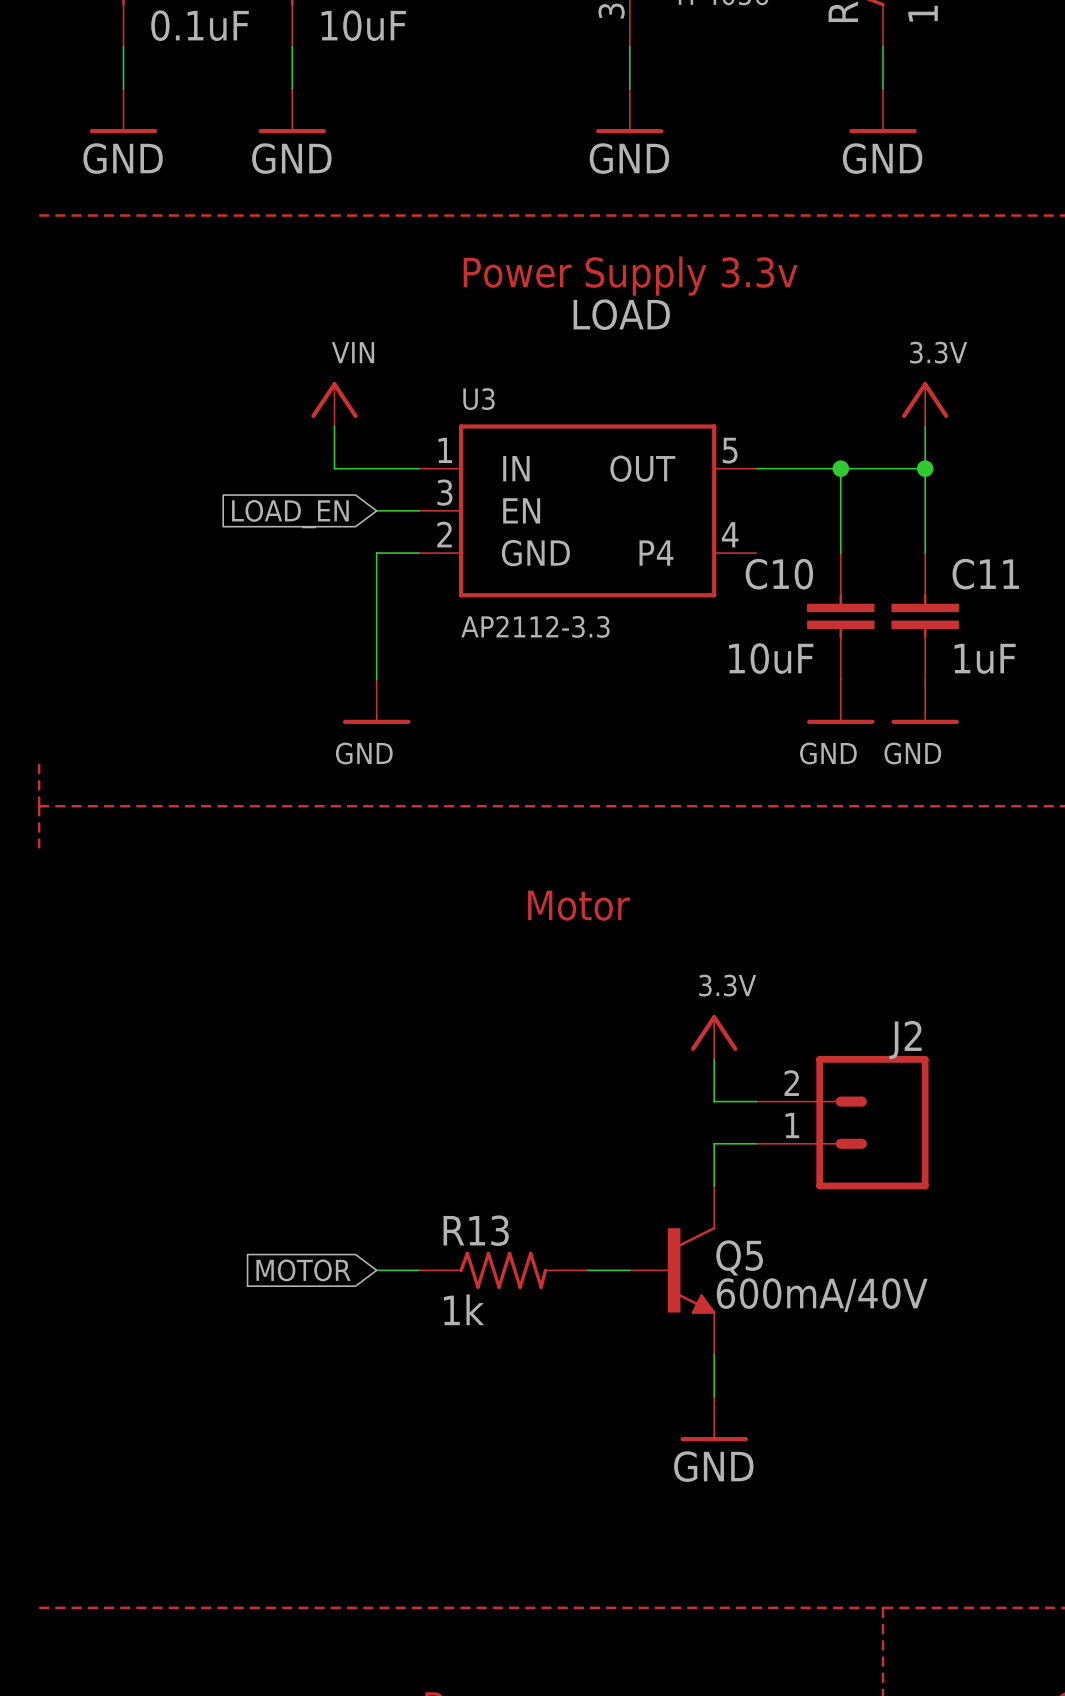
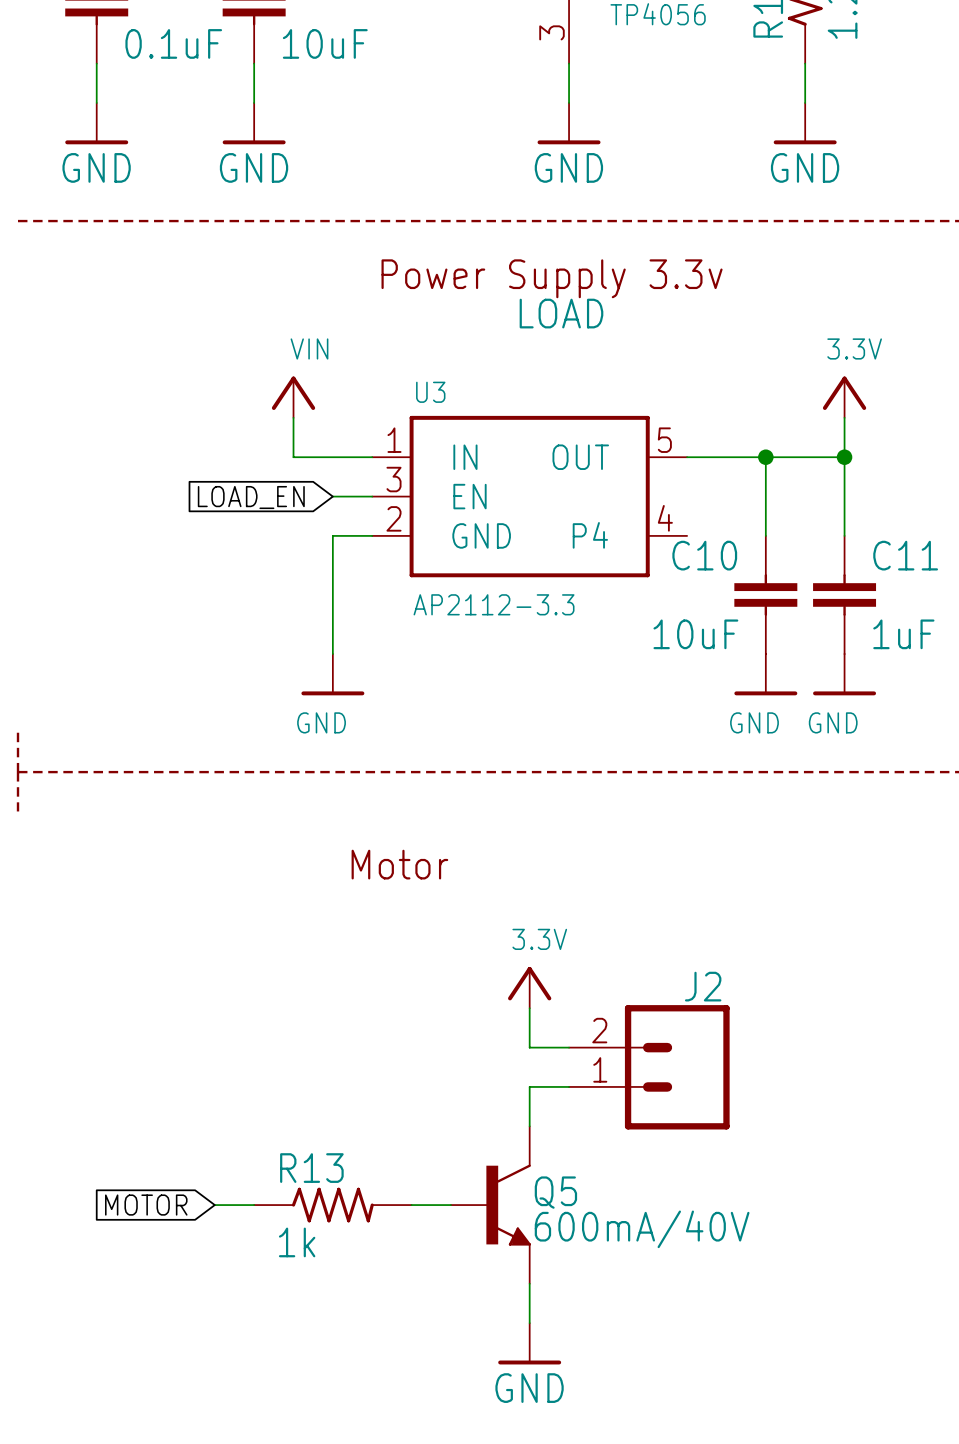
text position: Motor (578, 905) -> Motor (399, 864)
power symbol position: 3.3V (714, 1037) -> 3.3V (529, 987)
wire: (714, 1059) (714, 1101) (756, 1101) -> (529, 1008) (529, 1047) (569, 1047)
J2 position: (842, 1122) -> (649, 1067)
wire: (756, 1143) (714, 1143) (714, 1185) -> (569, 1086) (529, 1086) (529, 1126)
global label position: MOTOR (303, 1270) -> MOTOR (146, 1205)
wire: (376, 1270) (418, 1270) -> (411, 1205) (450, 1205)
R13 position: (503, 1270) -> (332, 1205)
wire: (587, 1270) (629, 1270) -> (214, 1205) (254, 1205)
Q5 position: (672, 1270) -> (490, 1205)
wire: (714, 1354) (714, 1396) -> (529, 1283) (529, 1323)
power symbol position: GND (714, 1419) -> GND (529, 1343)

